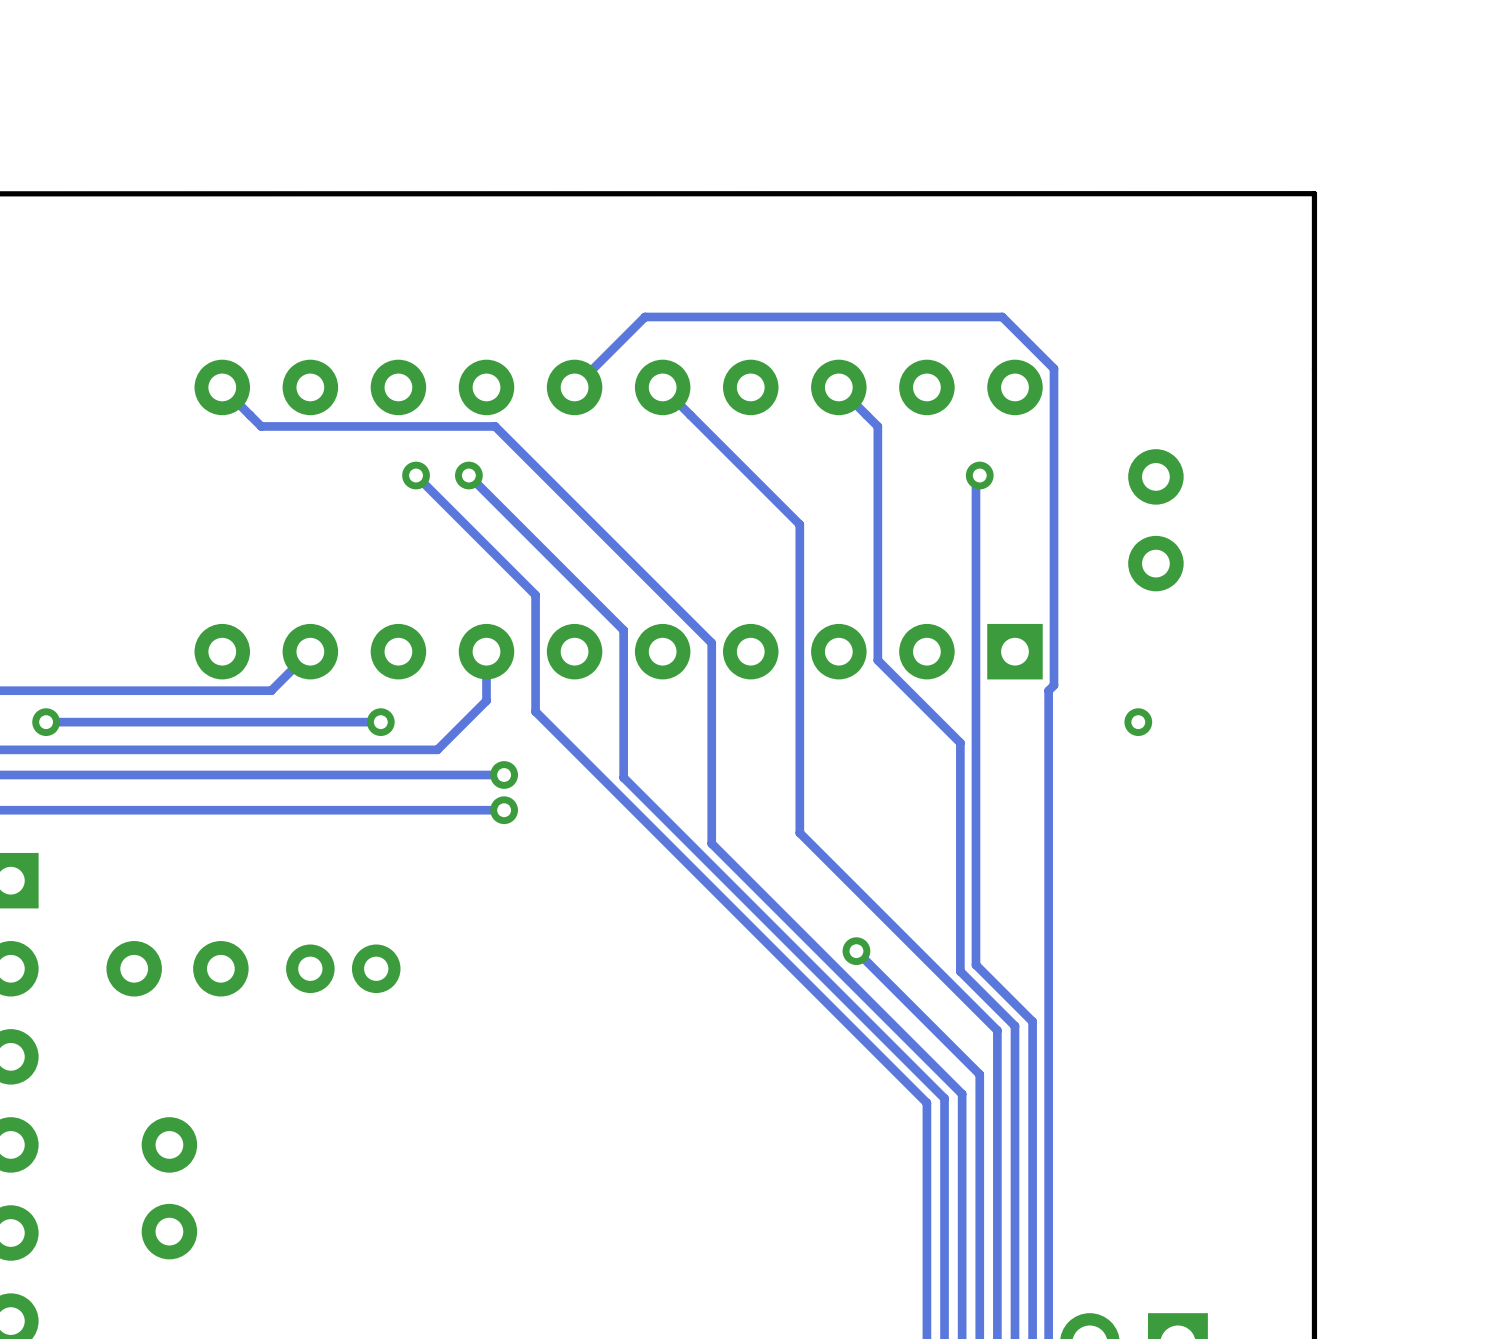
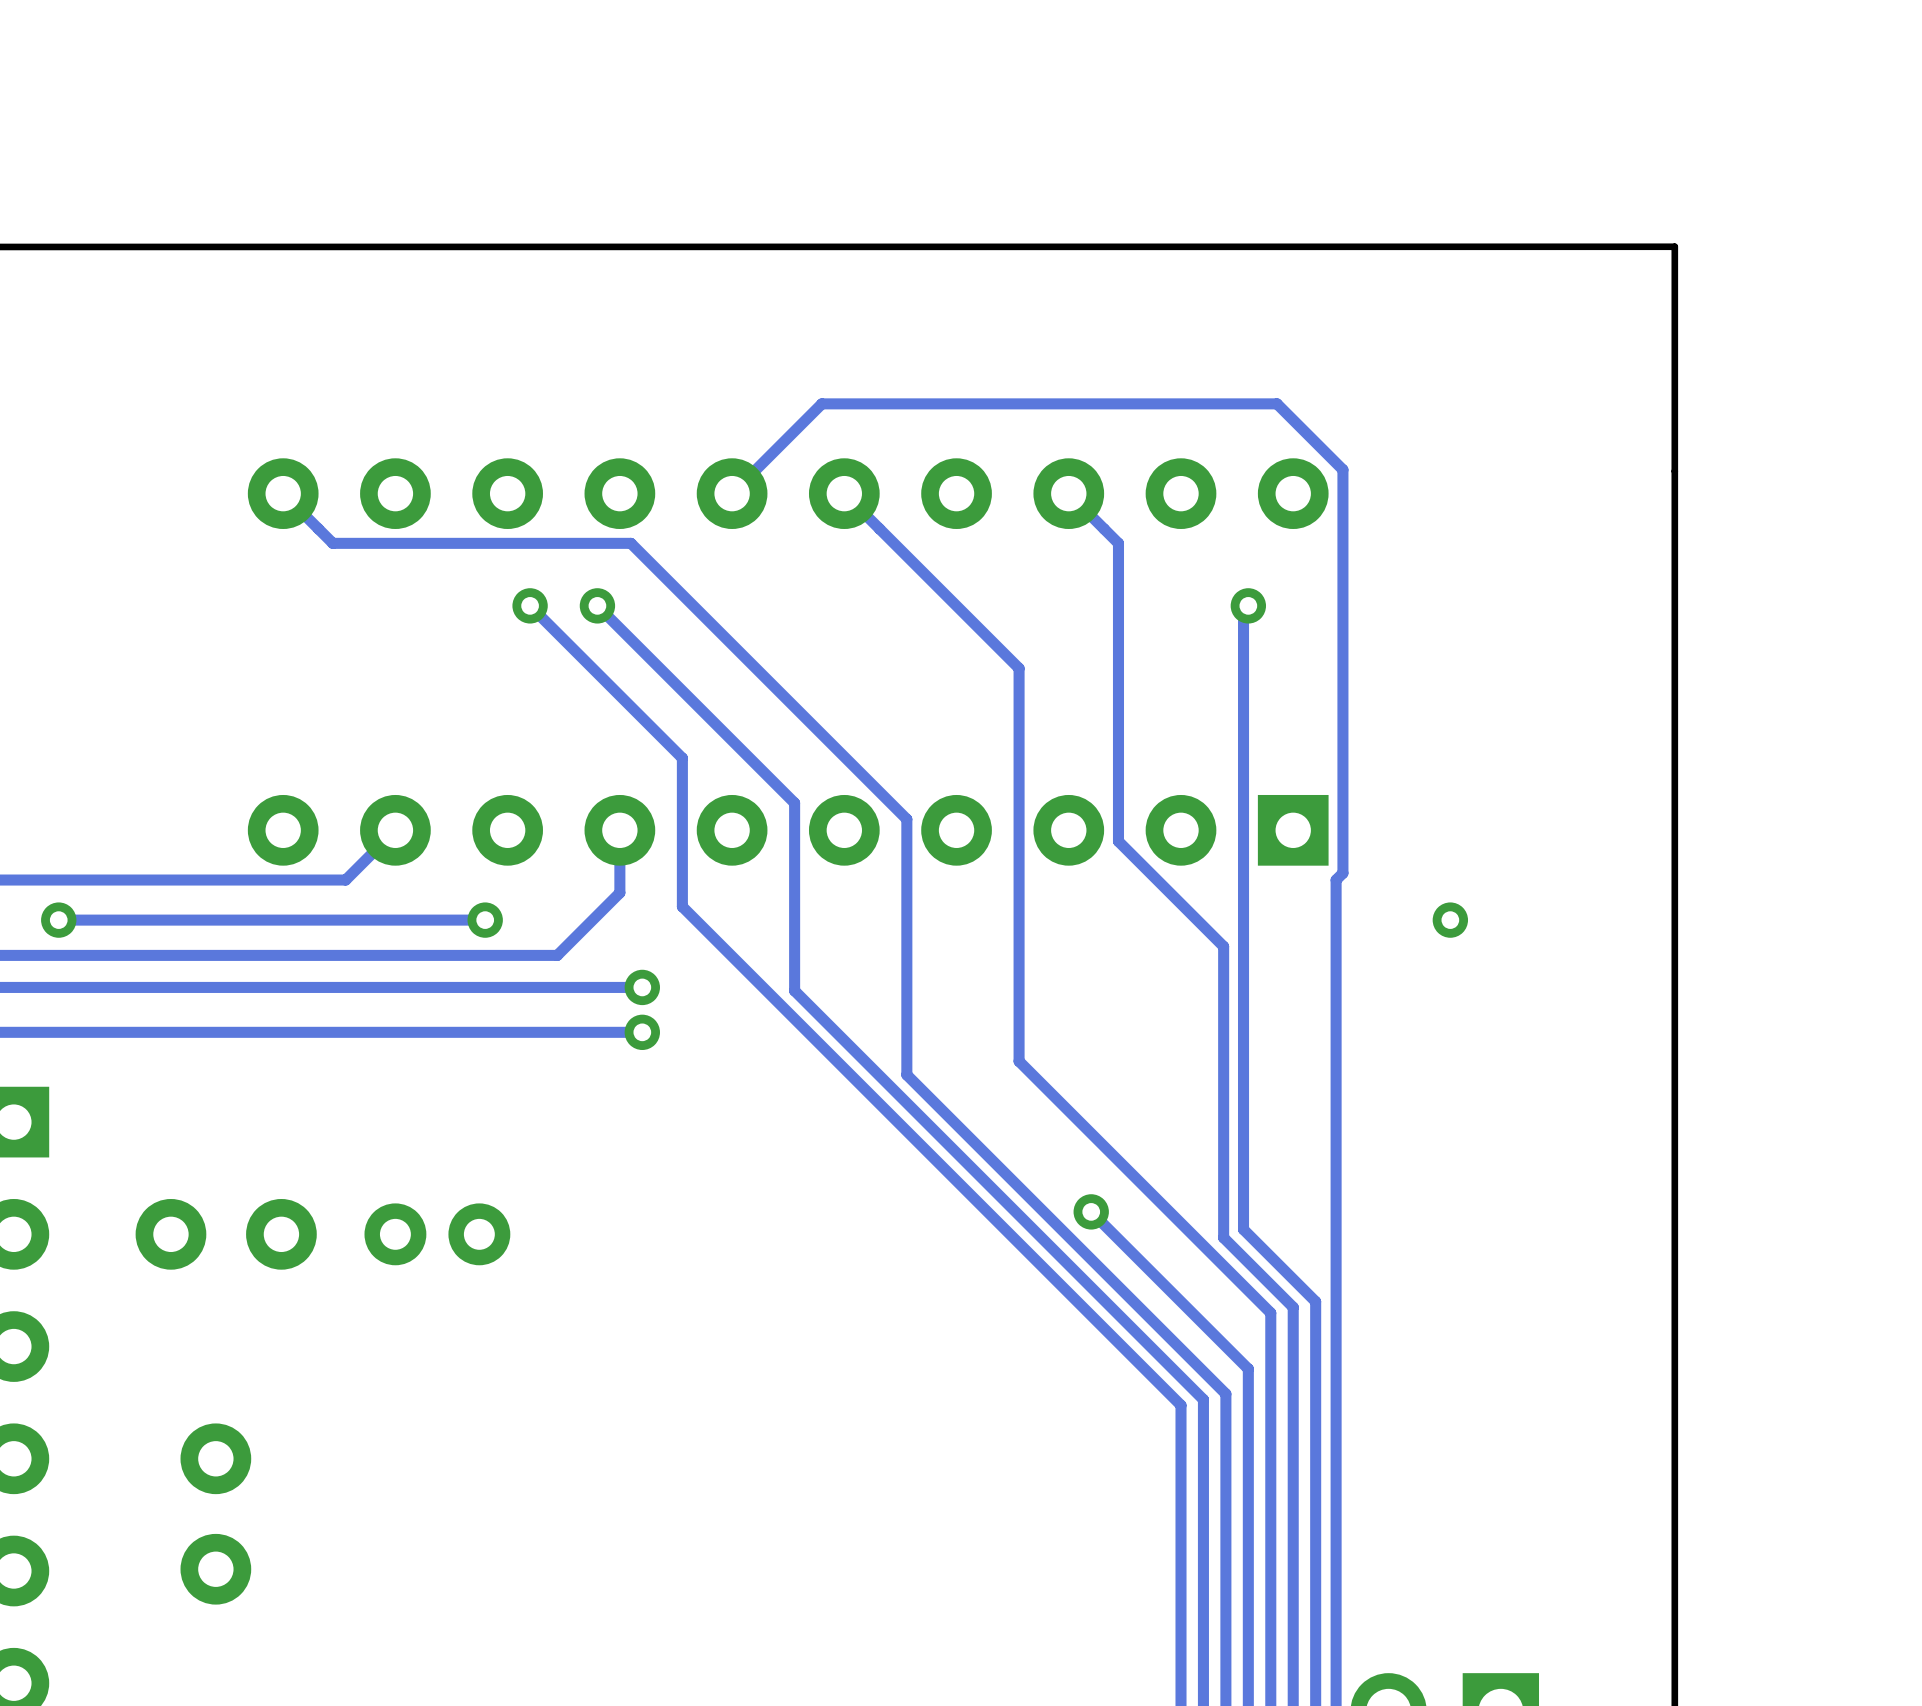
part: (1155, 520) -> none

